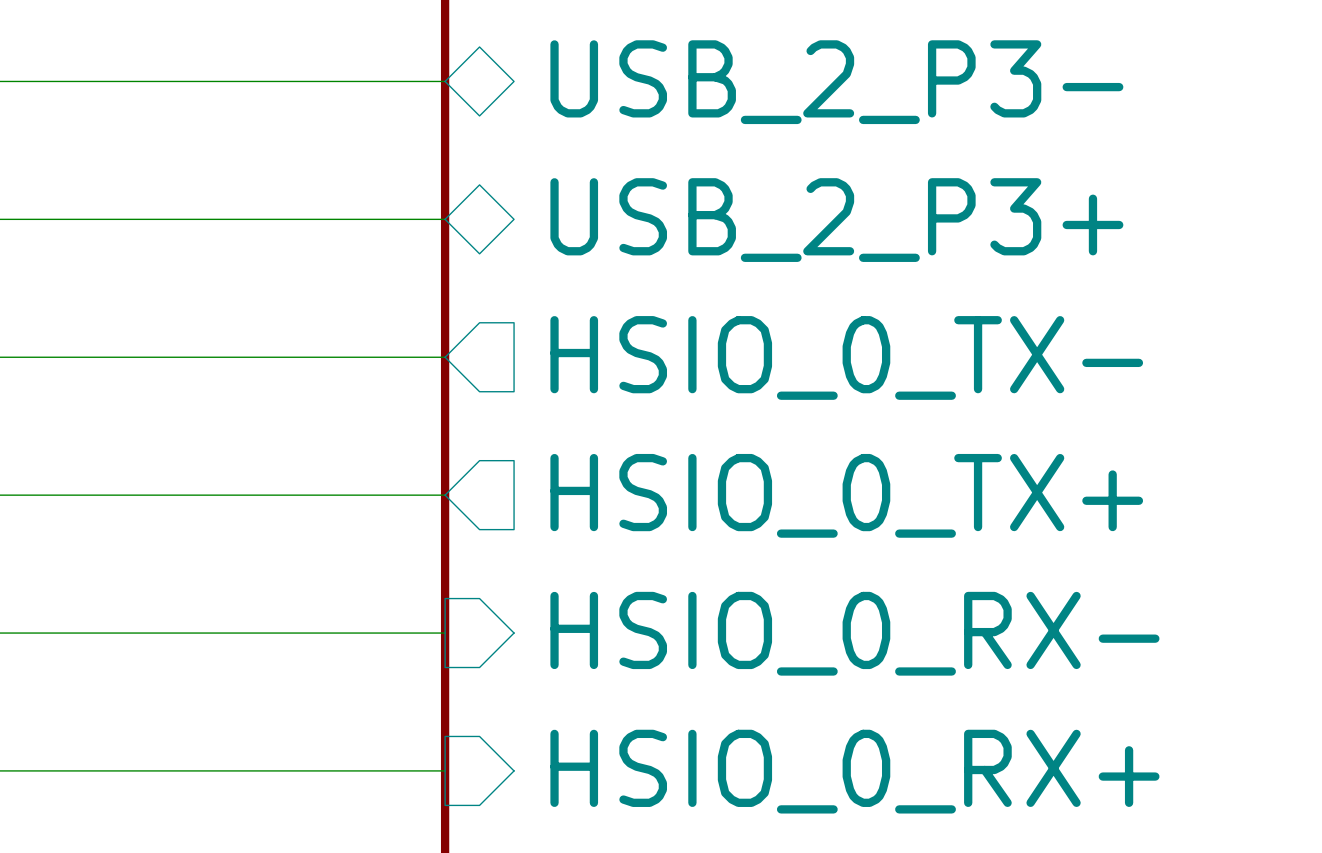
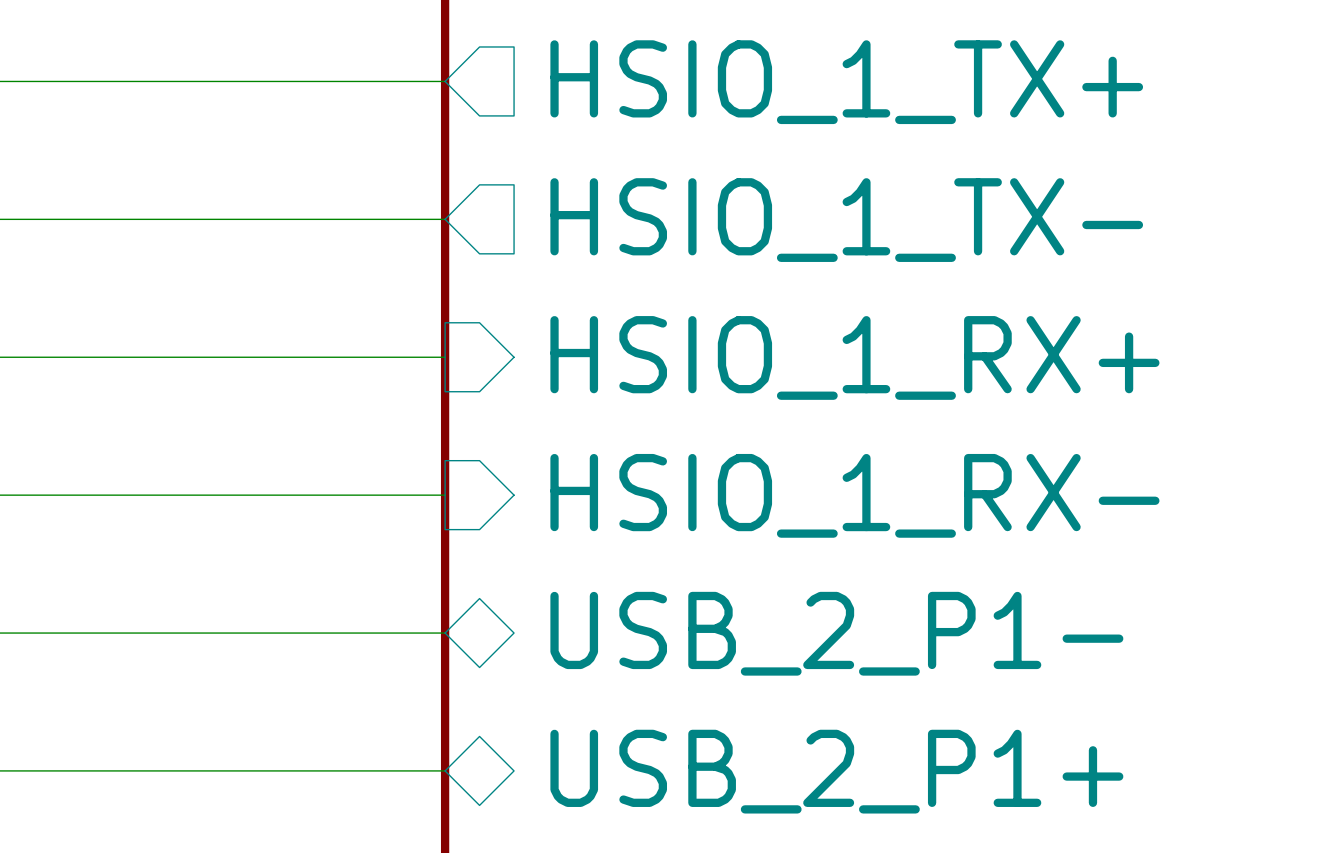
sheet pin shape: bidirectional (836, 82) -> output (846, 82)
sheet pin: USB_2_P3- (836, 82) -> HSIO_1_TX+ (846, 82)
sheet pin shape: bidirectional (836, 220) -> output (846, 220)
sheet pin: USB_2_P3+ (836, 220) -> HSIO_1_TX- (846, 220)
sheet pin shape: output (846, 357) -> input (854, 357)
sheet pin: HSIO_0_TX- (846, 357) -> HSIO_1_RX+ (854, 357)
sheet pin shape: output (846, 495) -> input (854, 495)
sheet pin: HSIO_0_TX+ (846, 495) -> HSIO_1_RX- (854, 495)
sheet pin shape: input (854, 633) -> bidirectional (836, 633)
sheet pin: HSIO_0_RX- (854, 633) -> USB_2_P1- (836, 633)
sheet pin shape: input (854, 771) -> bidirectional (836, 771)
sheet pin: HSIO_0_RX+ (854, 771) -> USB_2_P1+ (836, 771)

